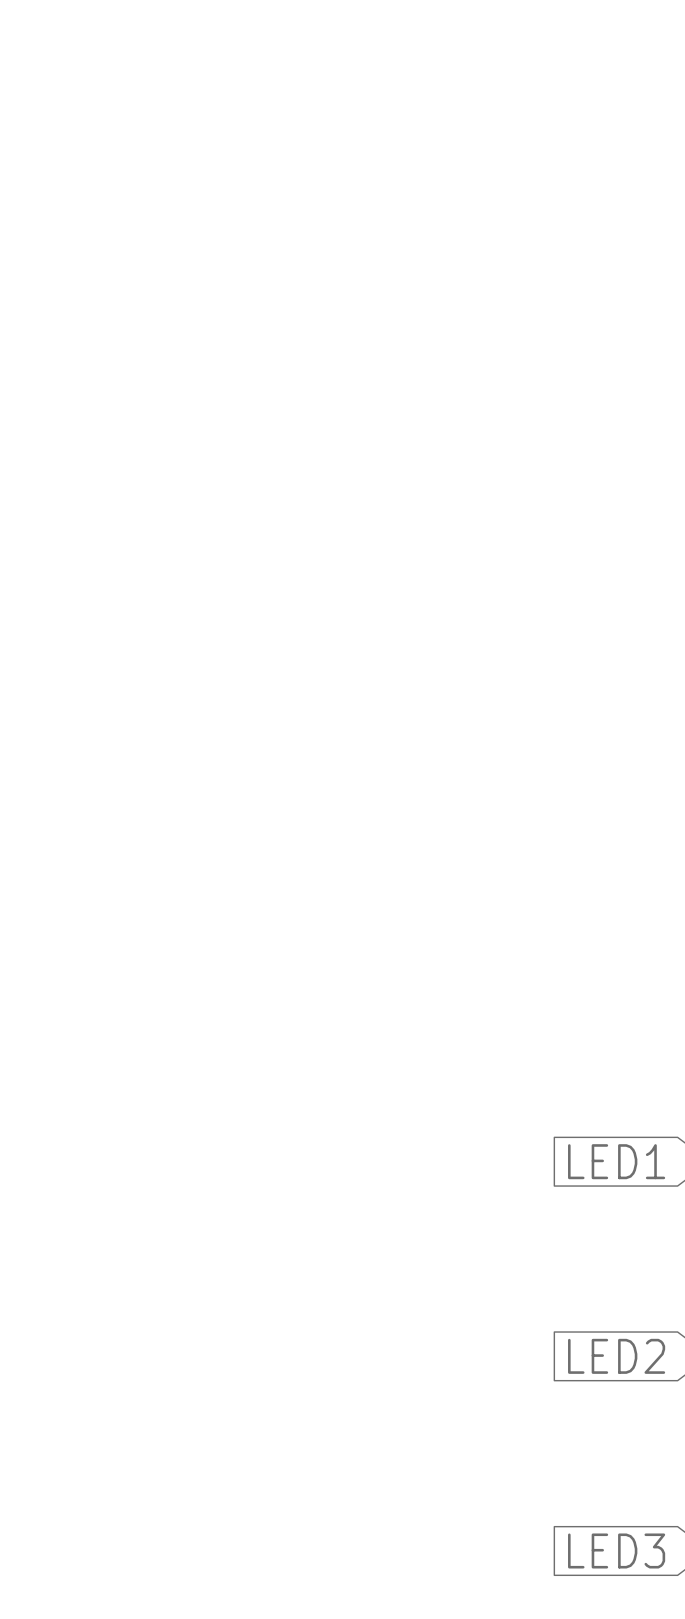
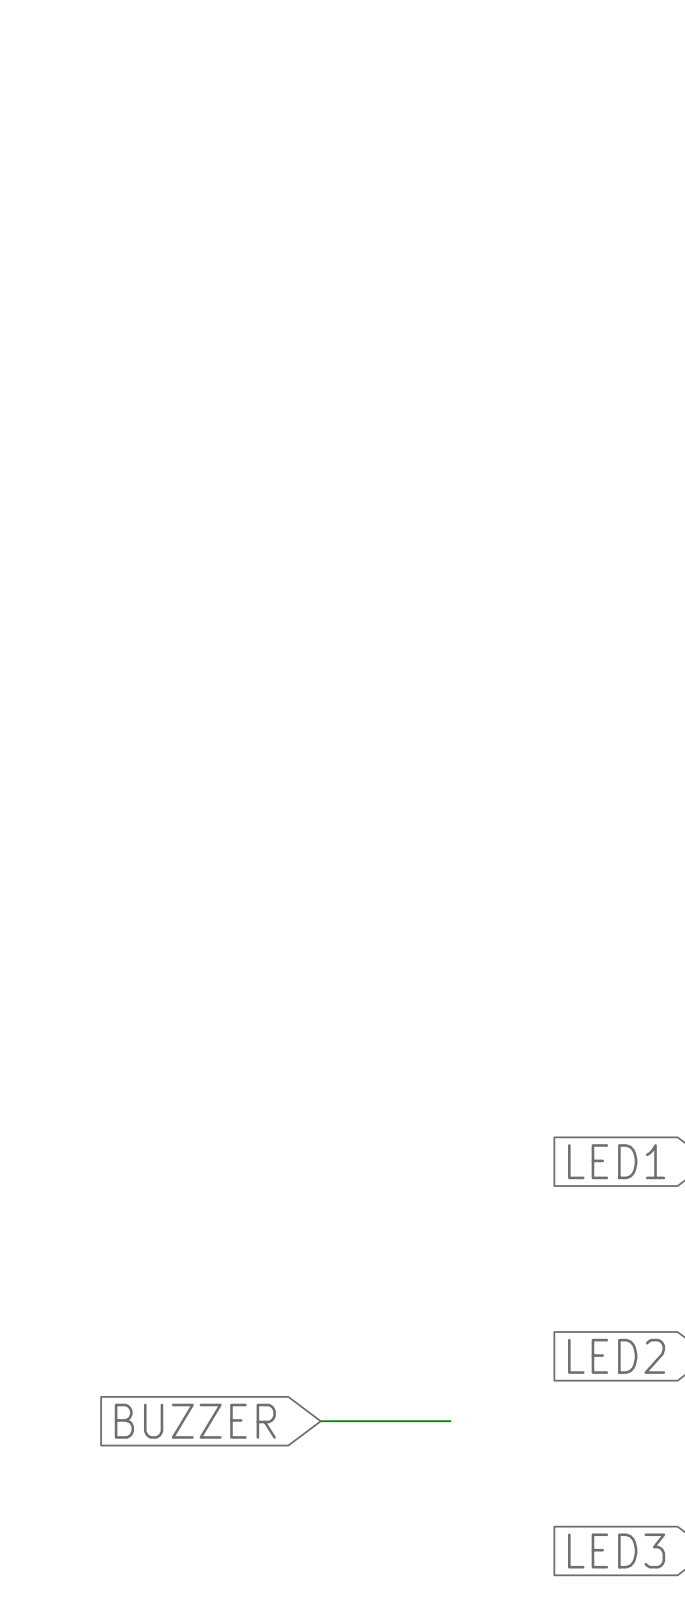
global label: none -> BUZZER (195, 1421)
wire: none -> (320, 1421) (450, 1421)

